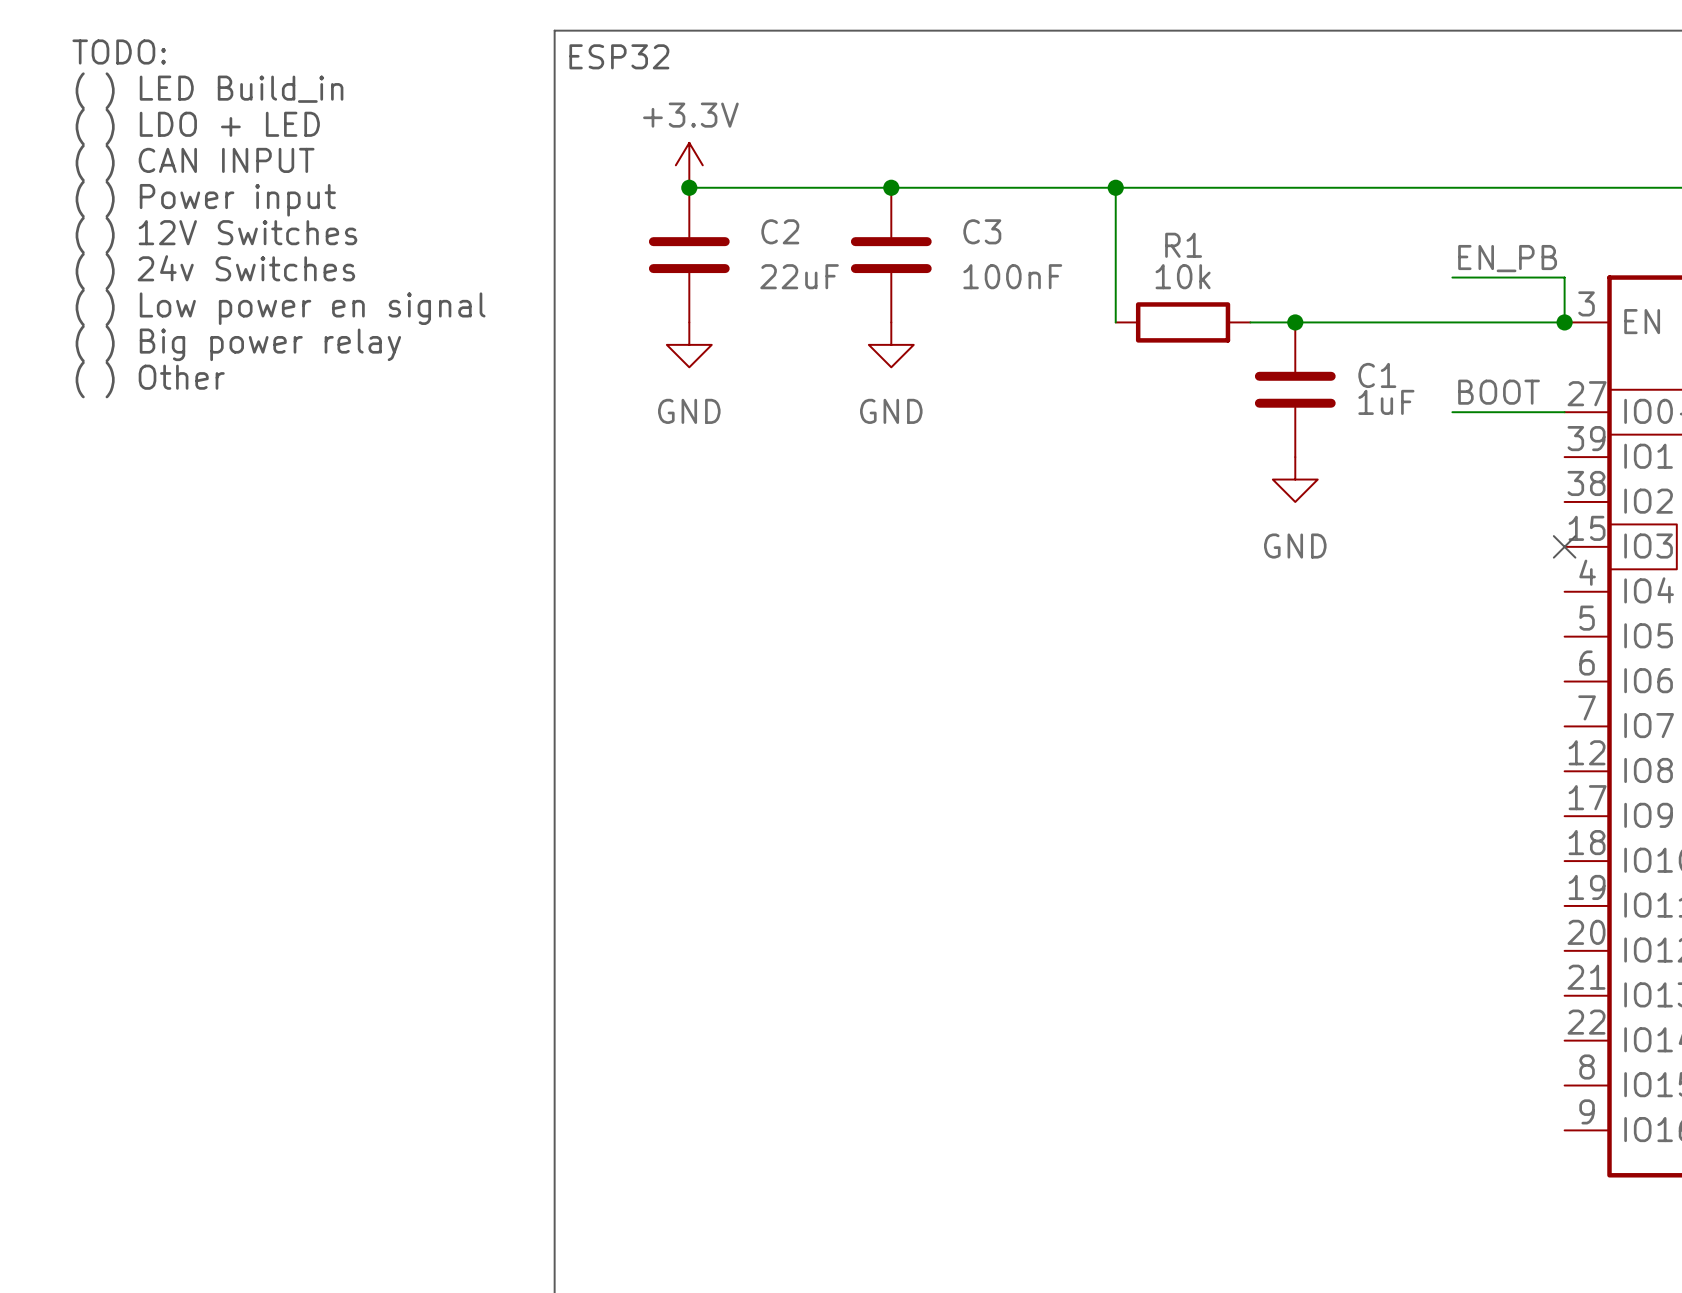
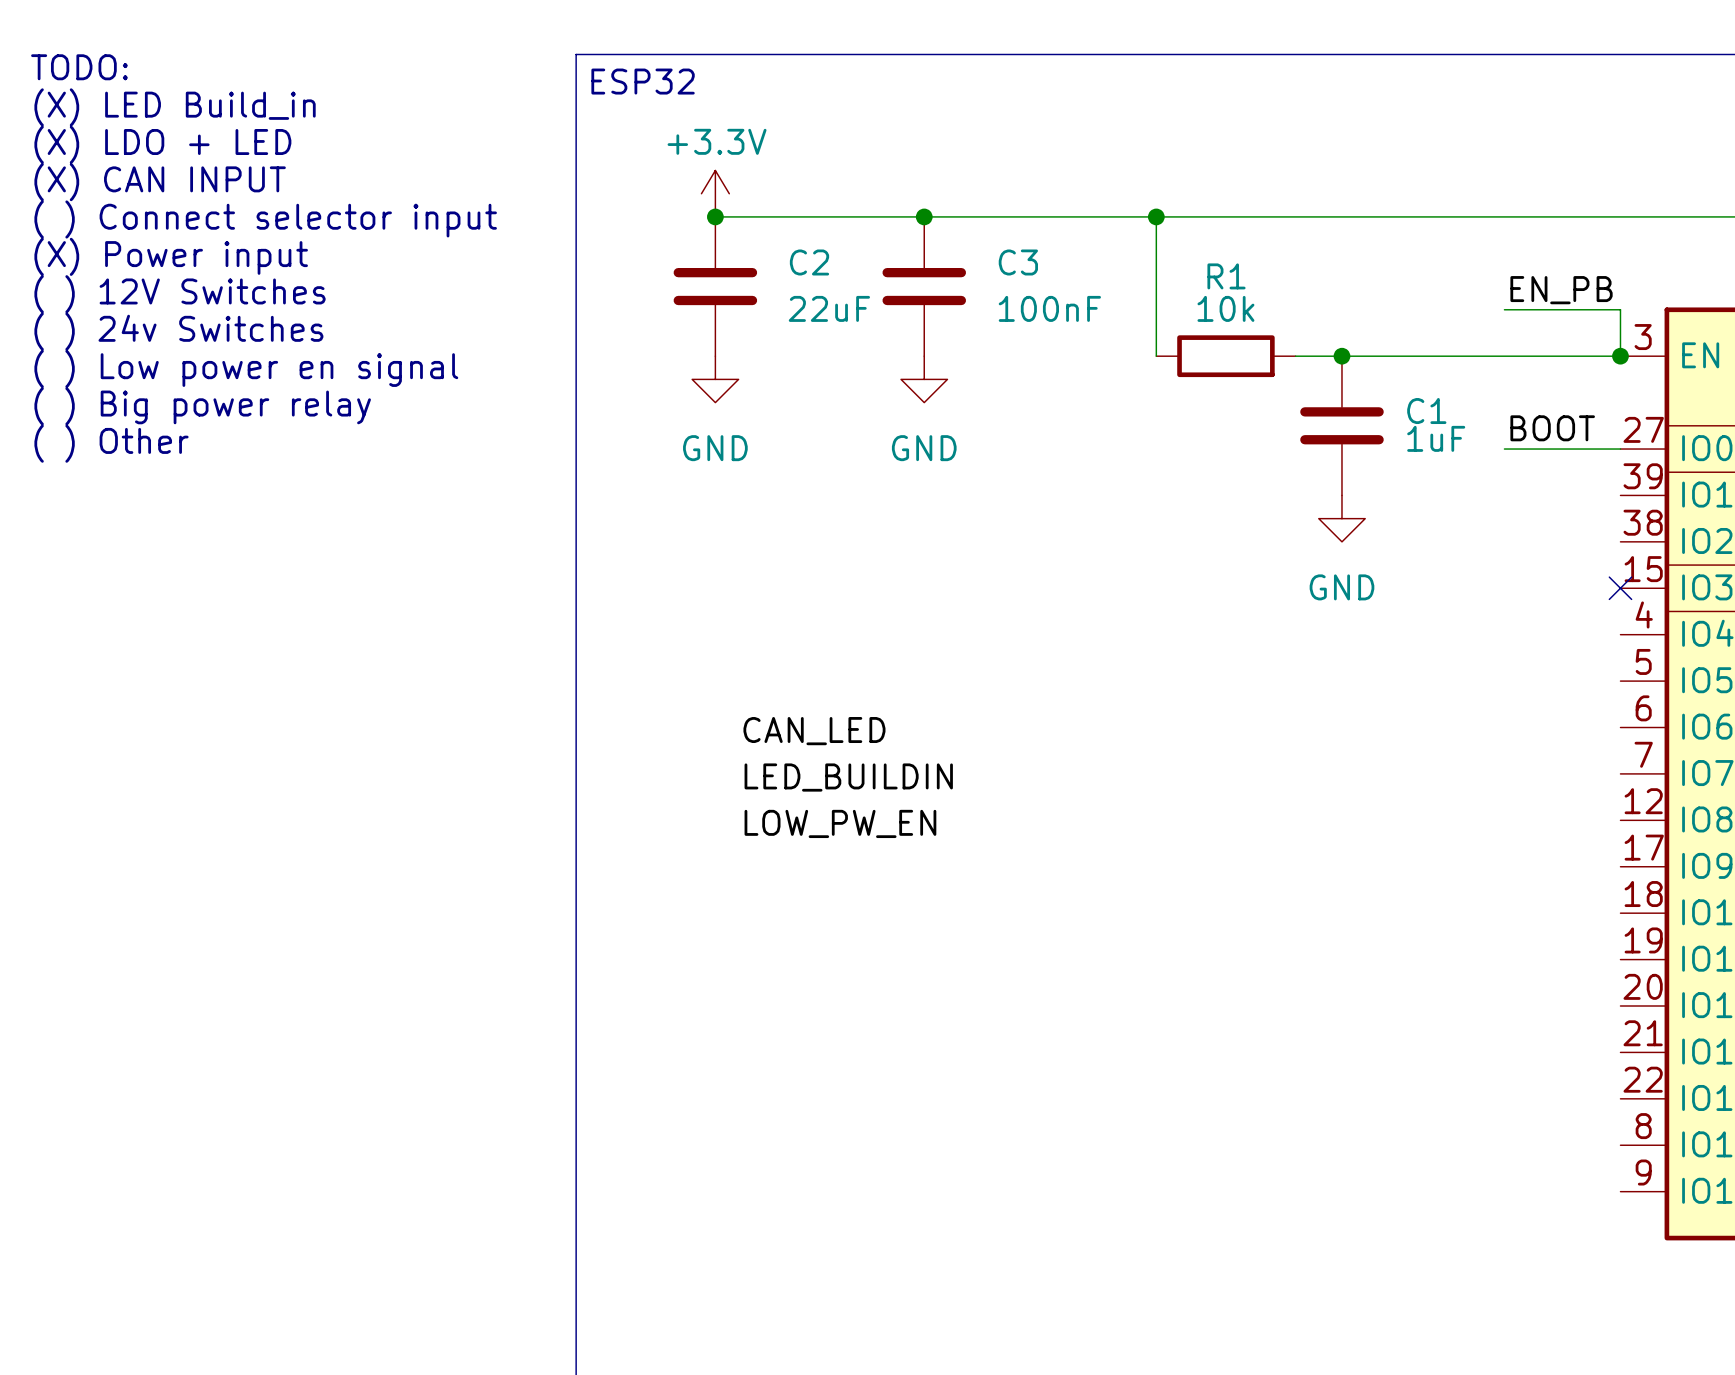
text position: TODO: (119, 52) -> TODO: (79, 67)
text: ( ) LED Build_in (209, 90) -> (X) LED Build_in (175, 107)
text: ( ) LDO + LED (197, 126) -> (X) LDO + LED (162, 144)
text: ( ) CAN INPUT (195, 163) -> (X) CAN INPUT (160, 182)
text: none -> ( ) Connect selector input (265, 219)
text: ( ) Power input (205, 199) -> none
text: none -> (X) Power input (171, 256)
text position: ( ) 12V Switches (216, 235) -> ( ) 12V Switches (180, 294)
text position: ( ) 24v Switches (215, 271) -> ( ) 24v Switches (178, 331)
text position: ( ) Low power en signal (280, 307) -> ( ) Low power en signal (246, 368)
text position: ( ) Big power relay (238, 343) -> ( ) Big power relay (202, 406)
text position: ( ) Other (150, 379) -> ( ) Other (111, 443)
label: none -> CAN_LED (814, 731)
label: none -> LED_BUILDIN (848, 777)
label: none -> LOW_PW_EN (840, 823)

